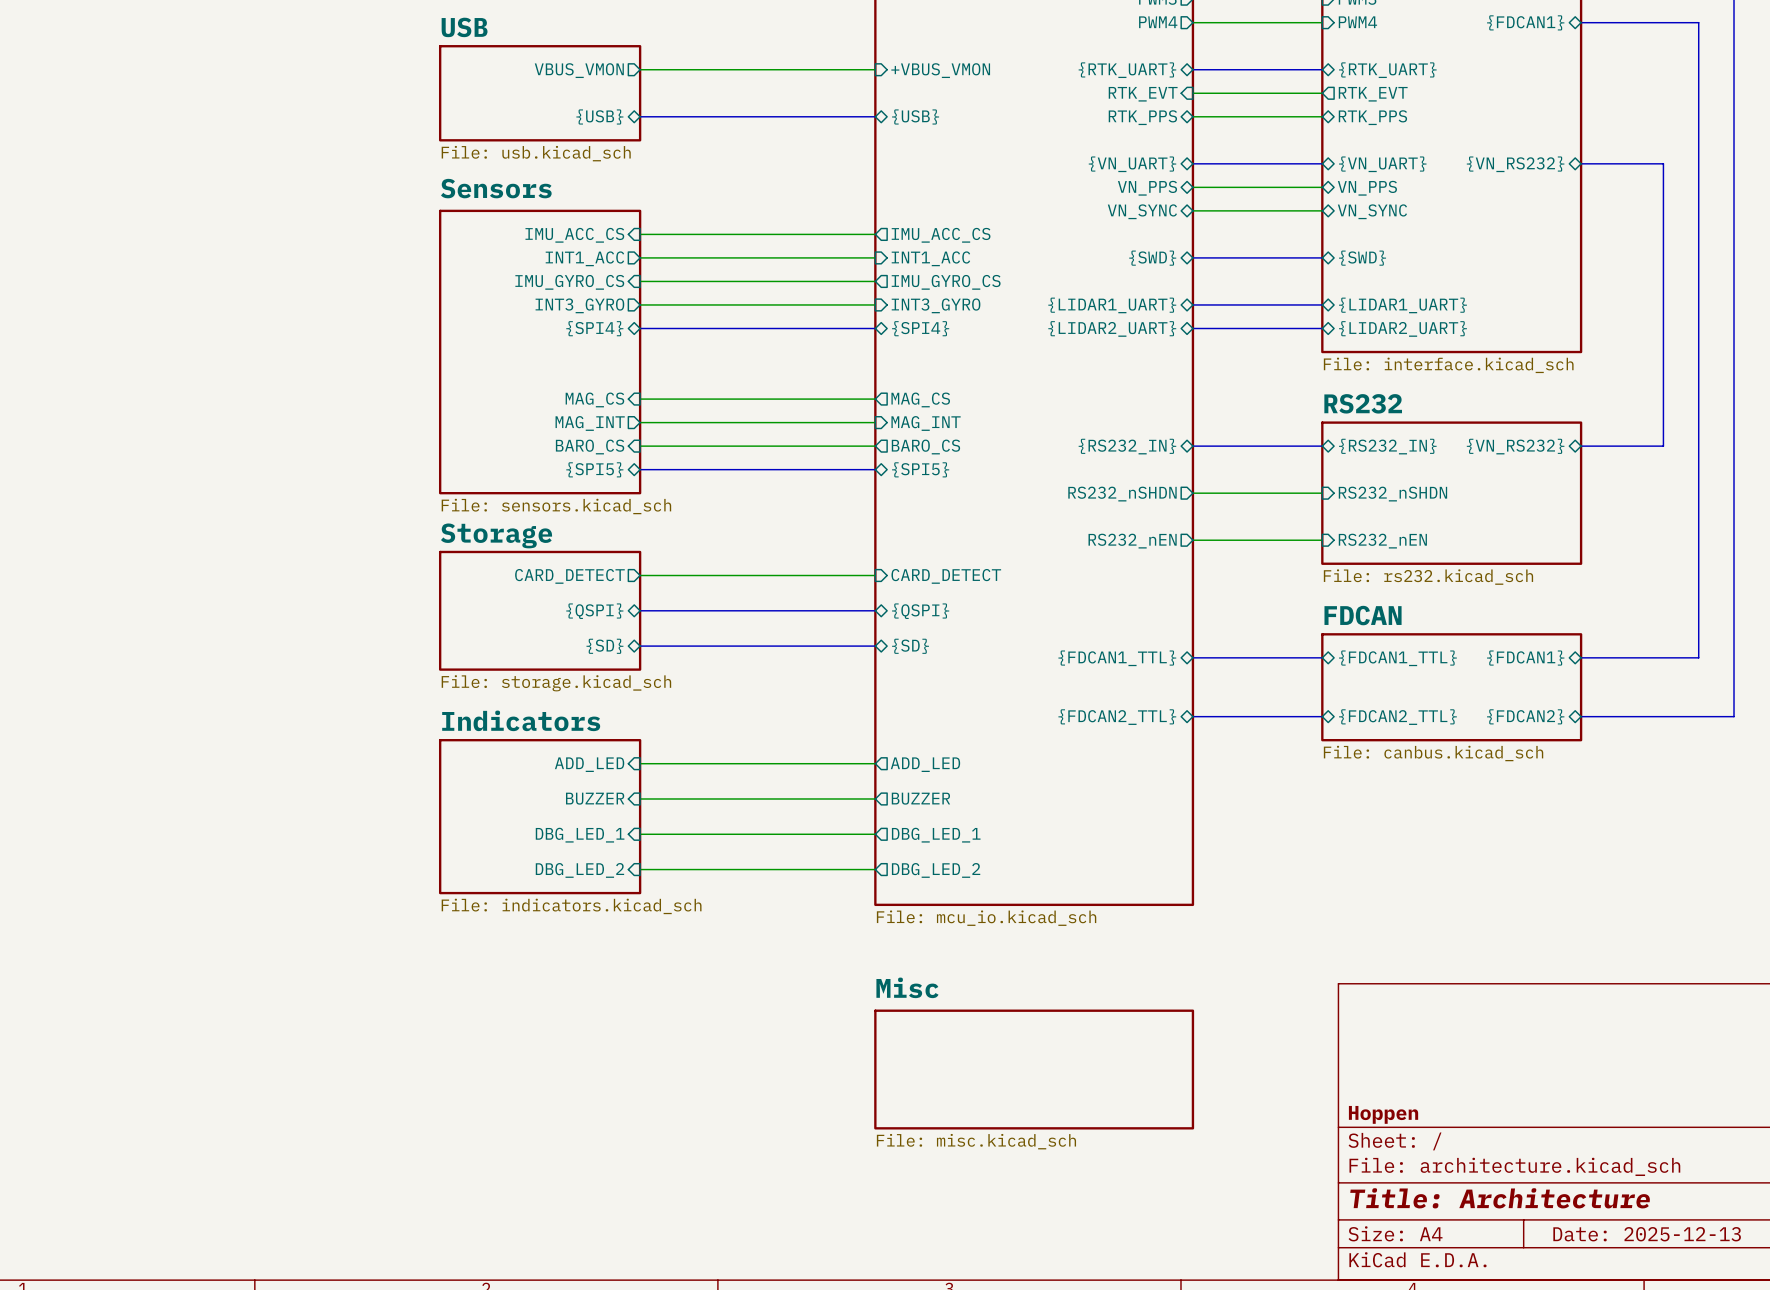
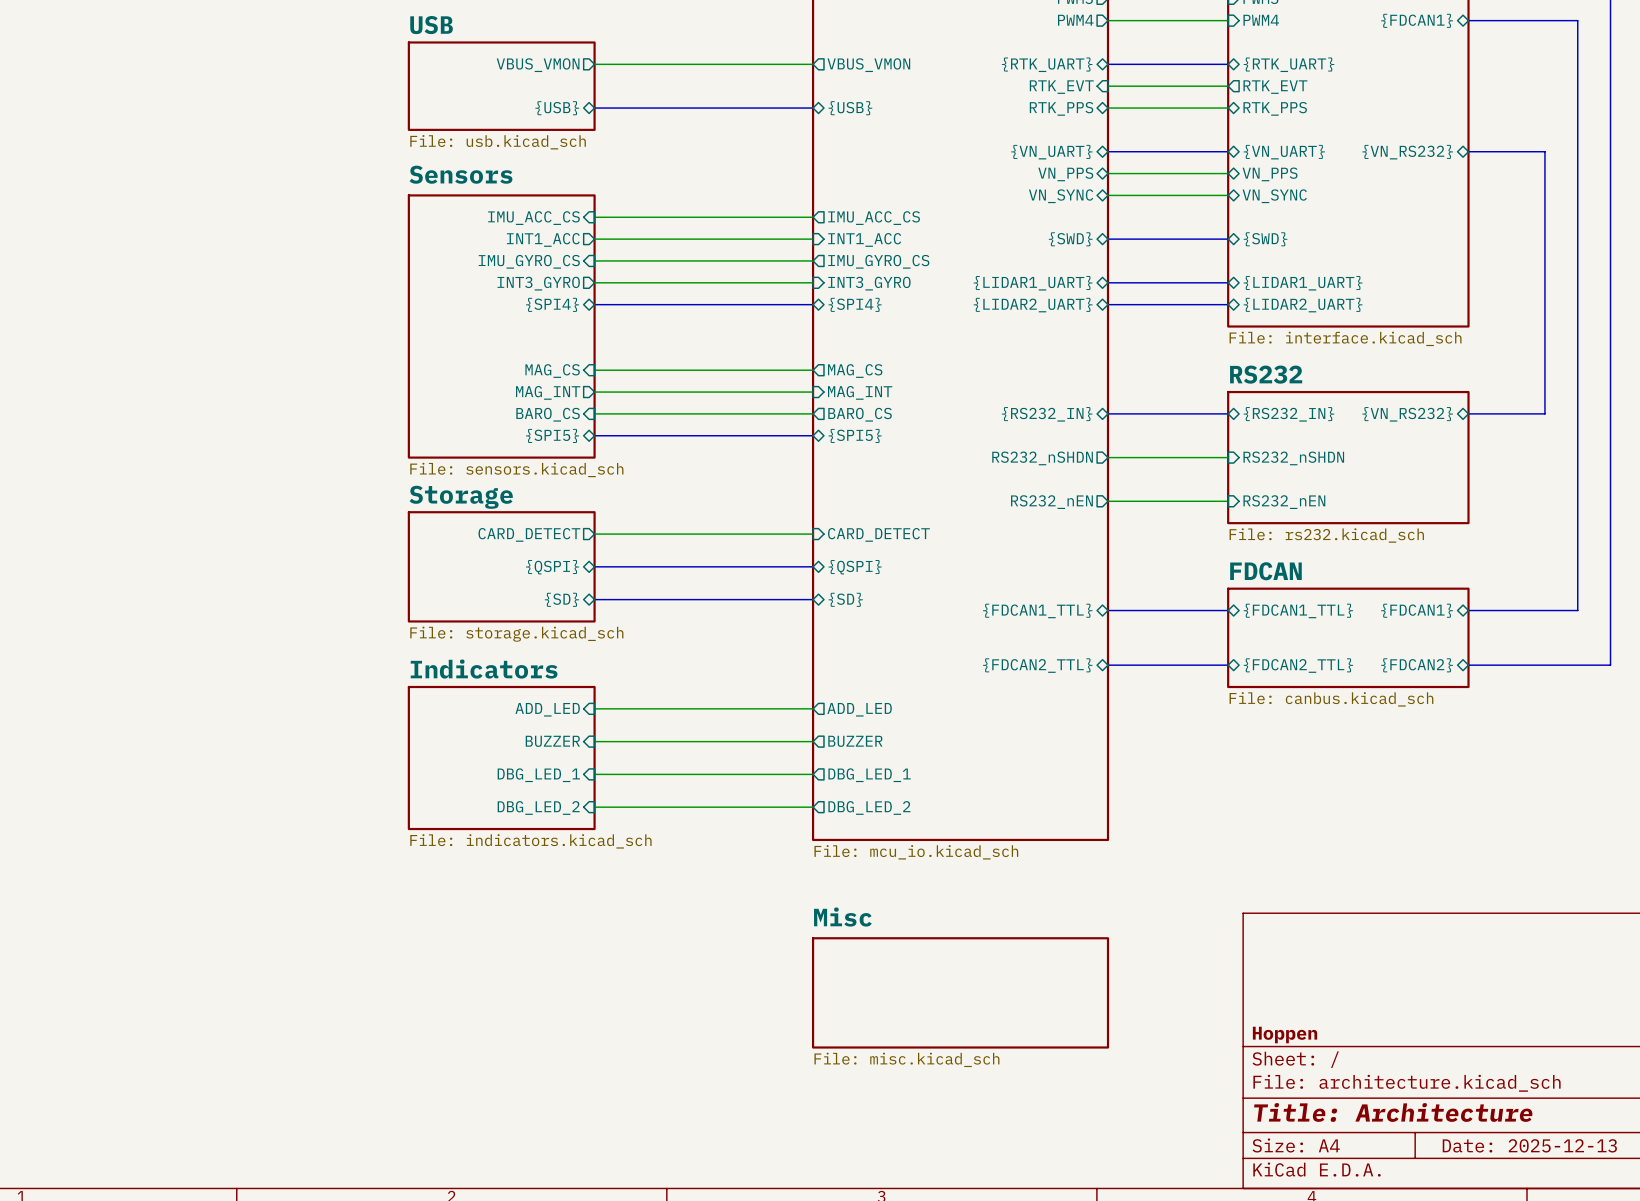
sheet pin shape: input (940, 70) -> output (868, 65)
sheet pin: +VBUS_VMON (940, 70) -> VBUS_VMON (868, 65)

